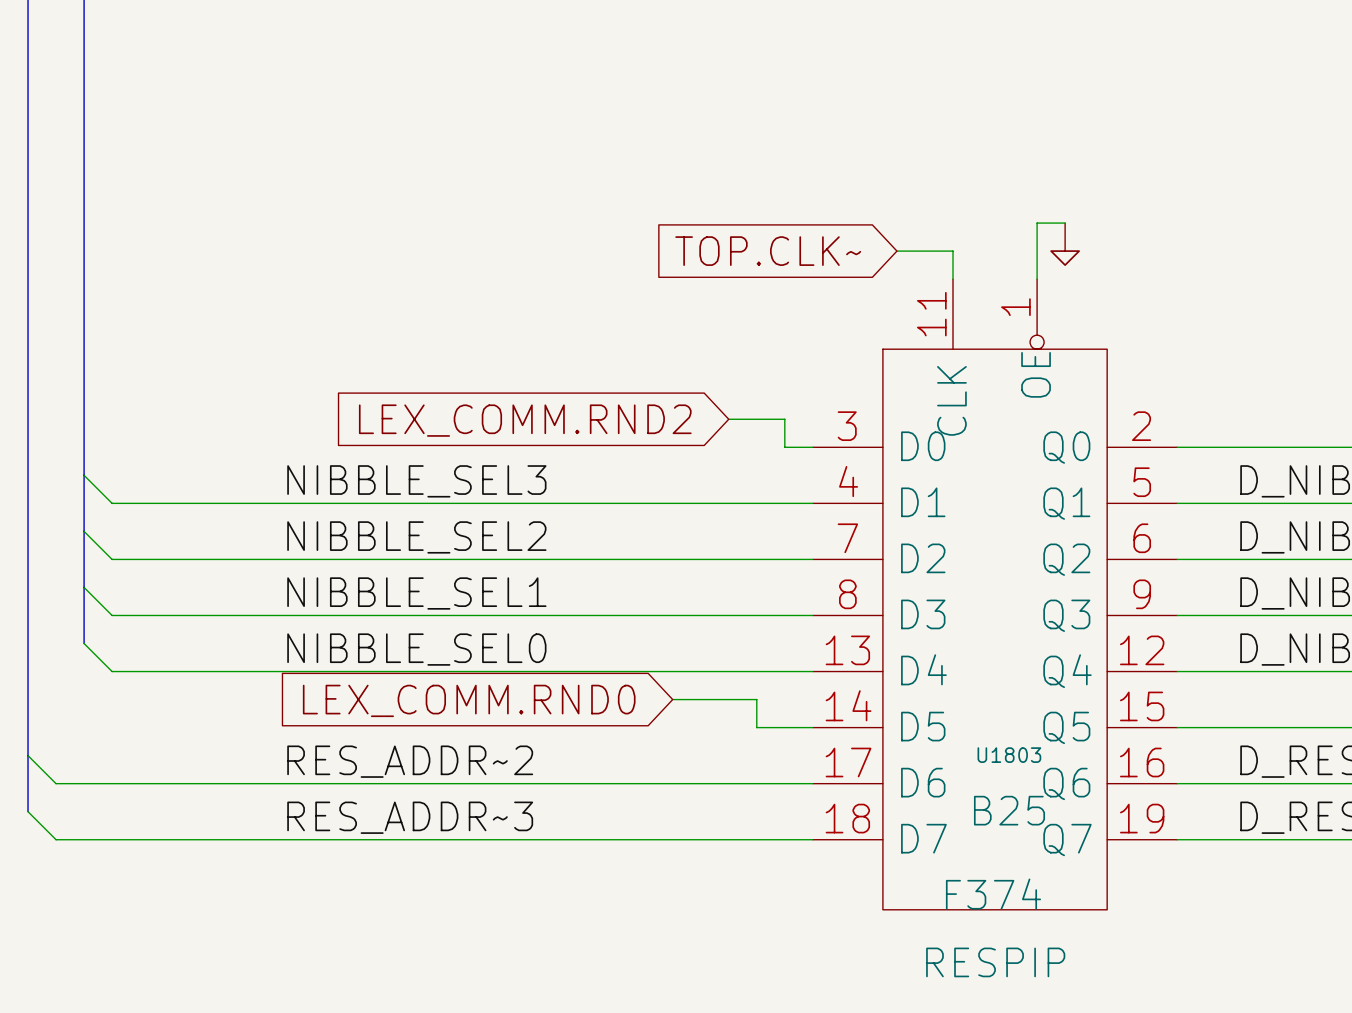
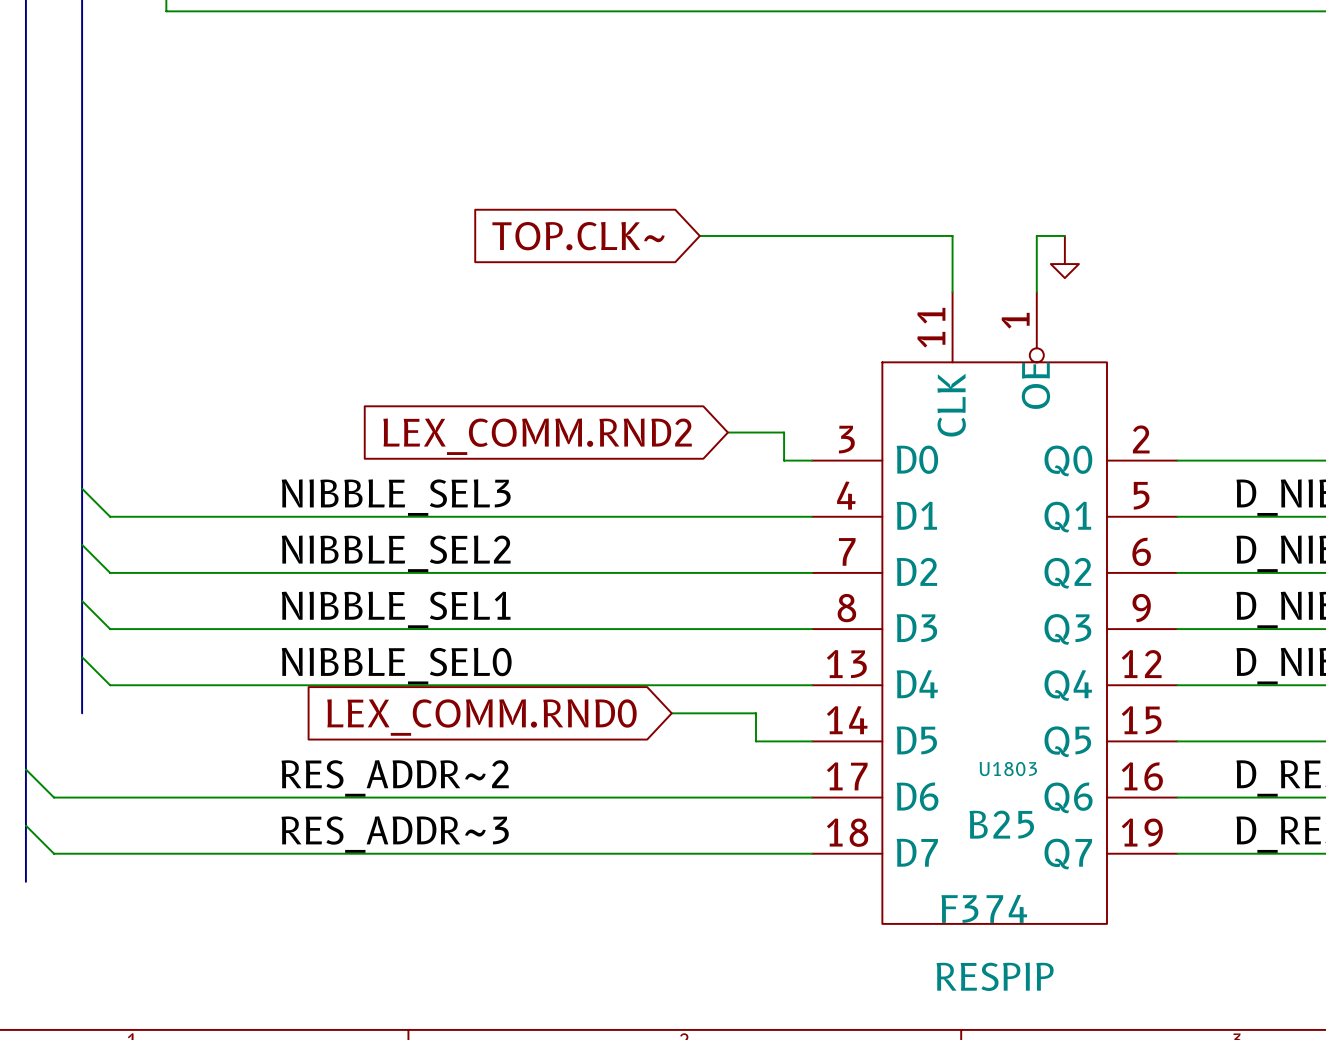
global label position: TOP.CLK~ (768, 251) -> TOP.CLK~ (578, 236)
wire: (896, 251) (952, 251) -> (699, 235) (952, 235) (952, 264)
bus: none -> (82, 657) (82, 713)
bus: none -> (25, 825) (25, 881)

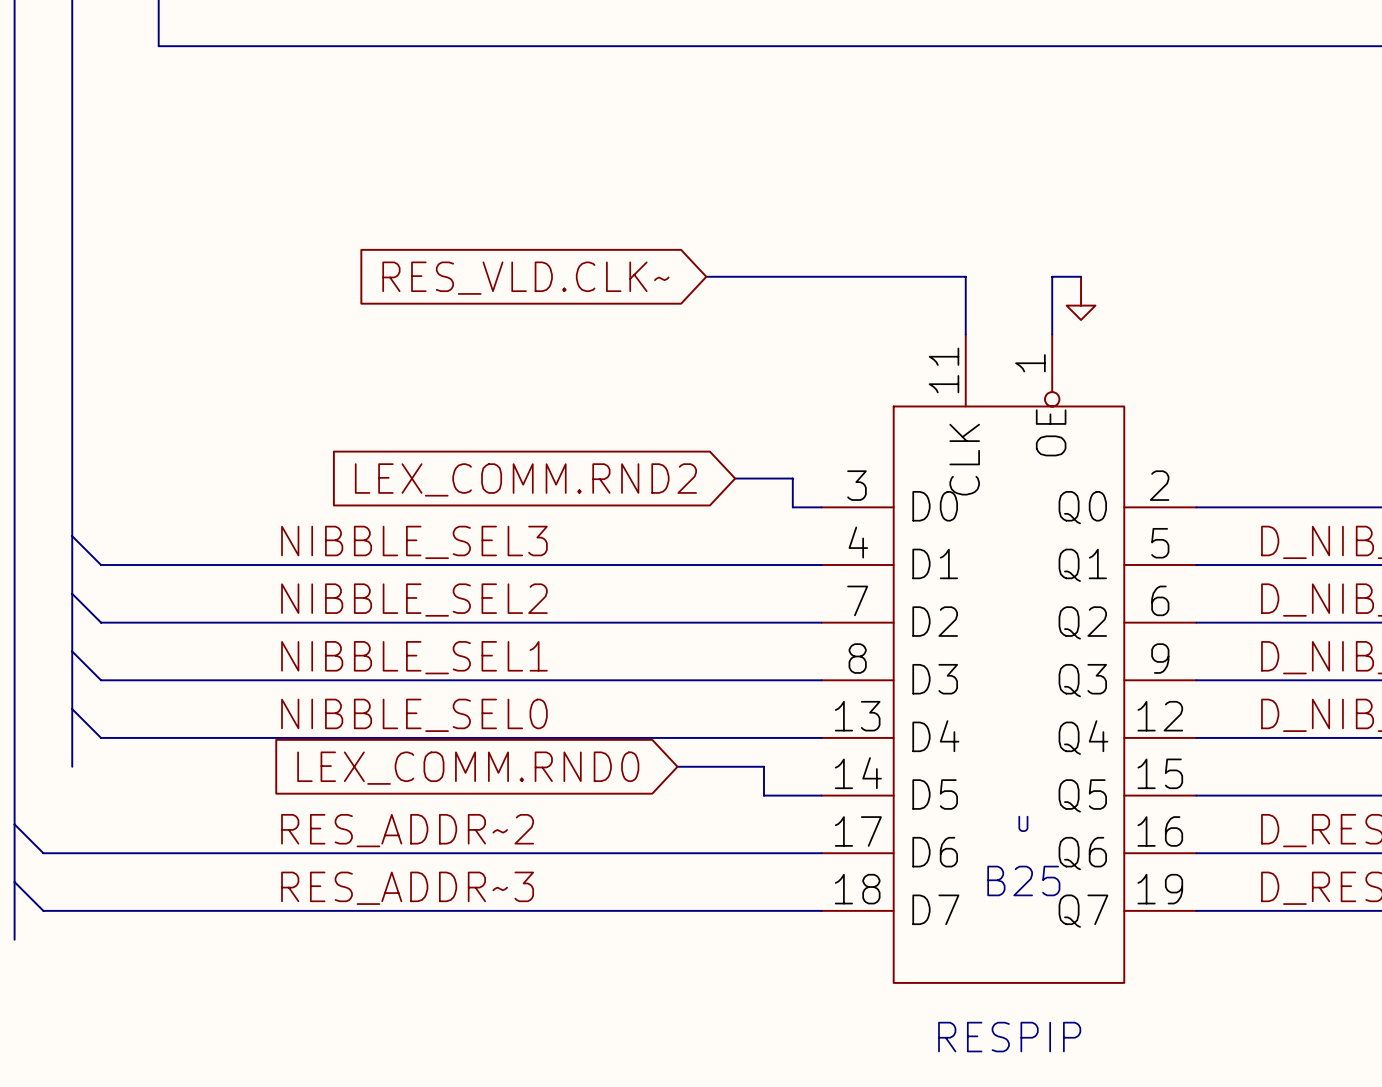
global label: TOP.CLK~ (578, 236) -> RES_VLD.CLK~ (525, 278)
U1803 name: U1803 (1008, 769) -> U (1023, 823)
U1803 value: F374 (984, 908) -> none

